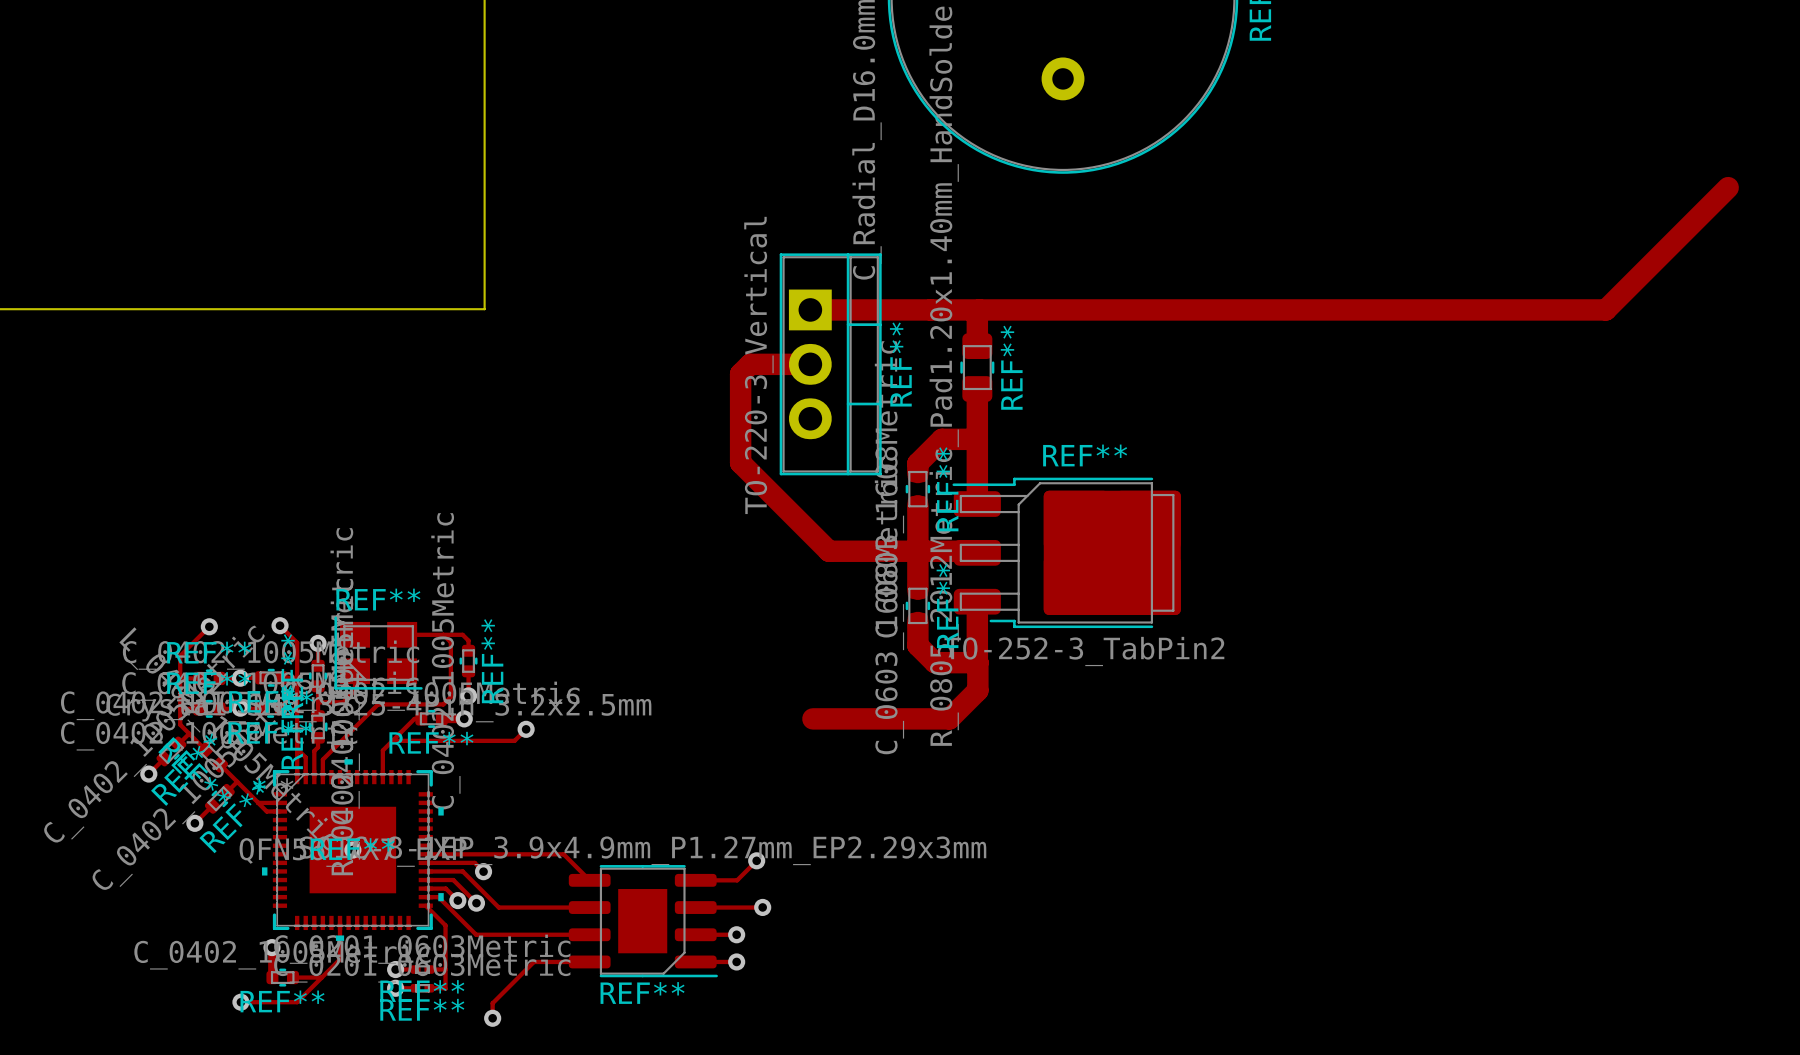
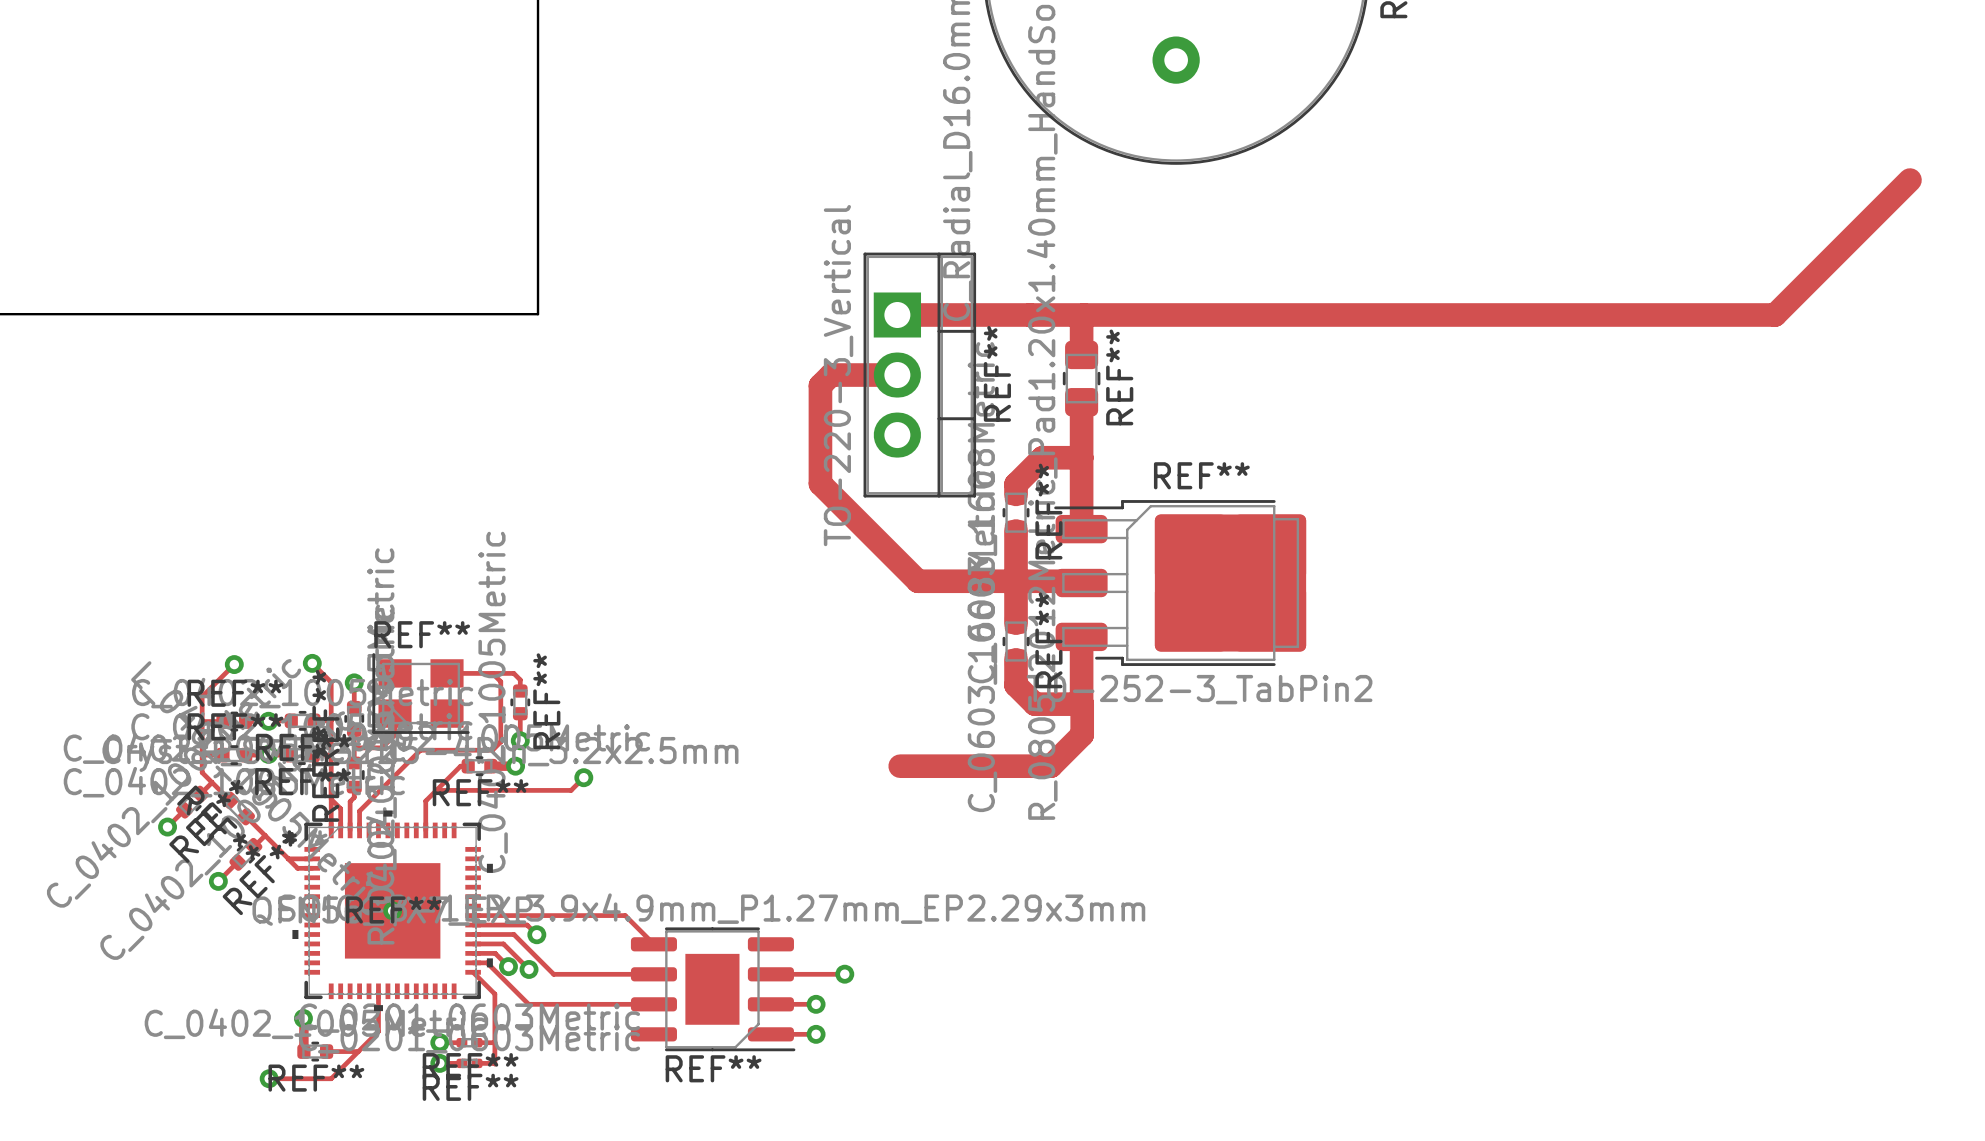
track: (756, 860) (737, 880) (695, 880) -> none
via: (756, 860) -> none
track: (589, 961) (533, 961) (492, 1003) (492, 1018) -> none
via: (492, 1018) -> none

